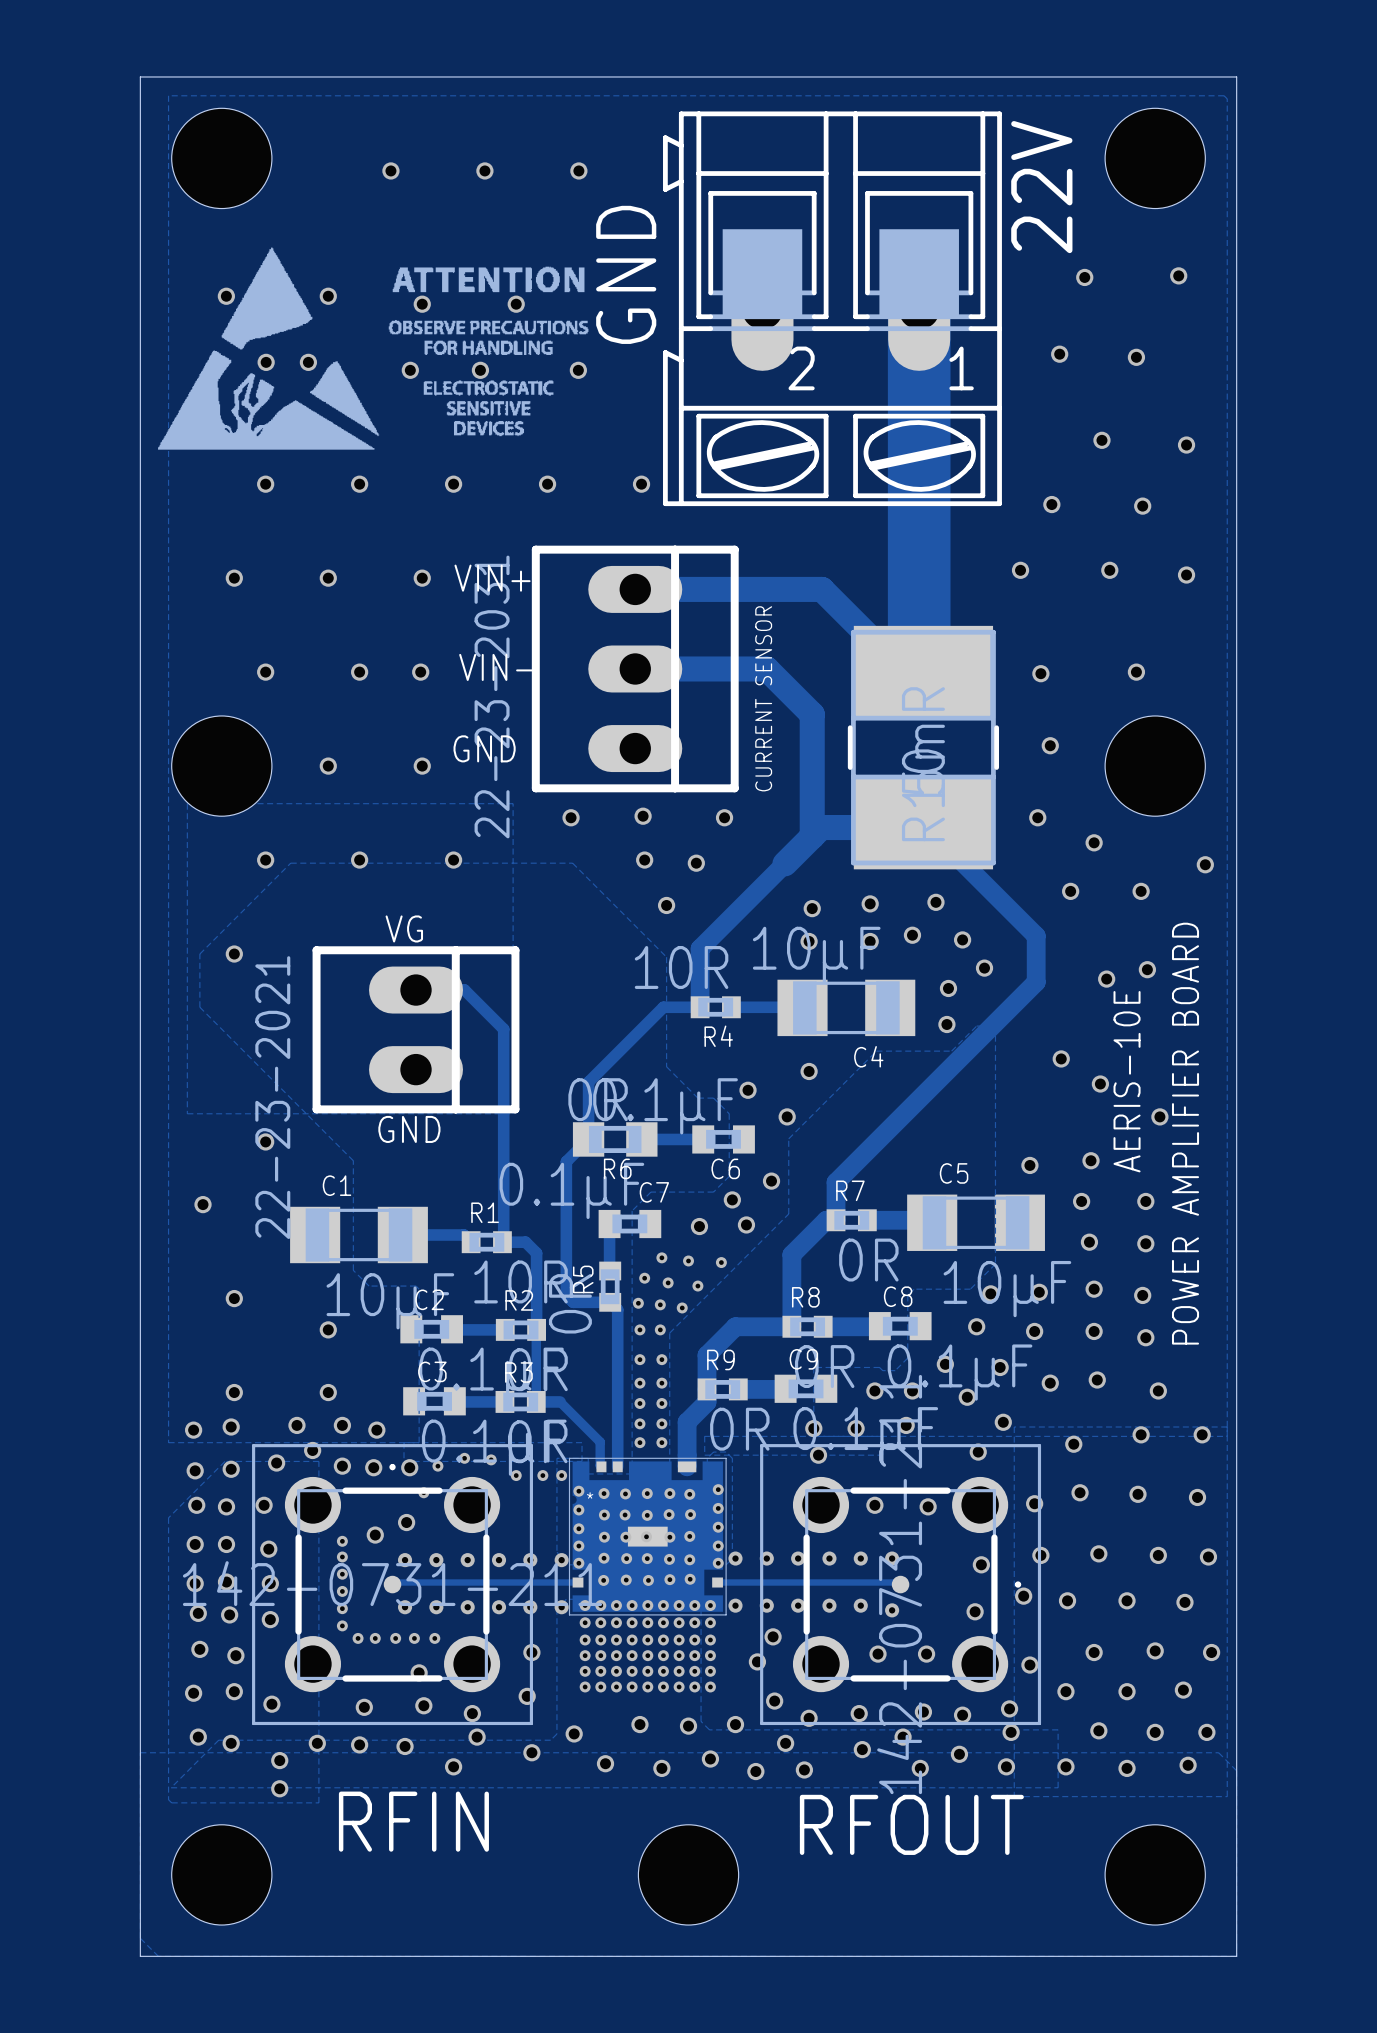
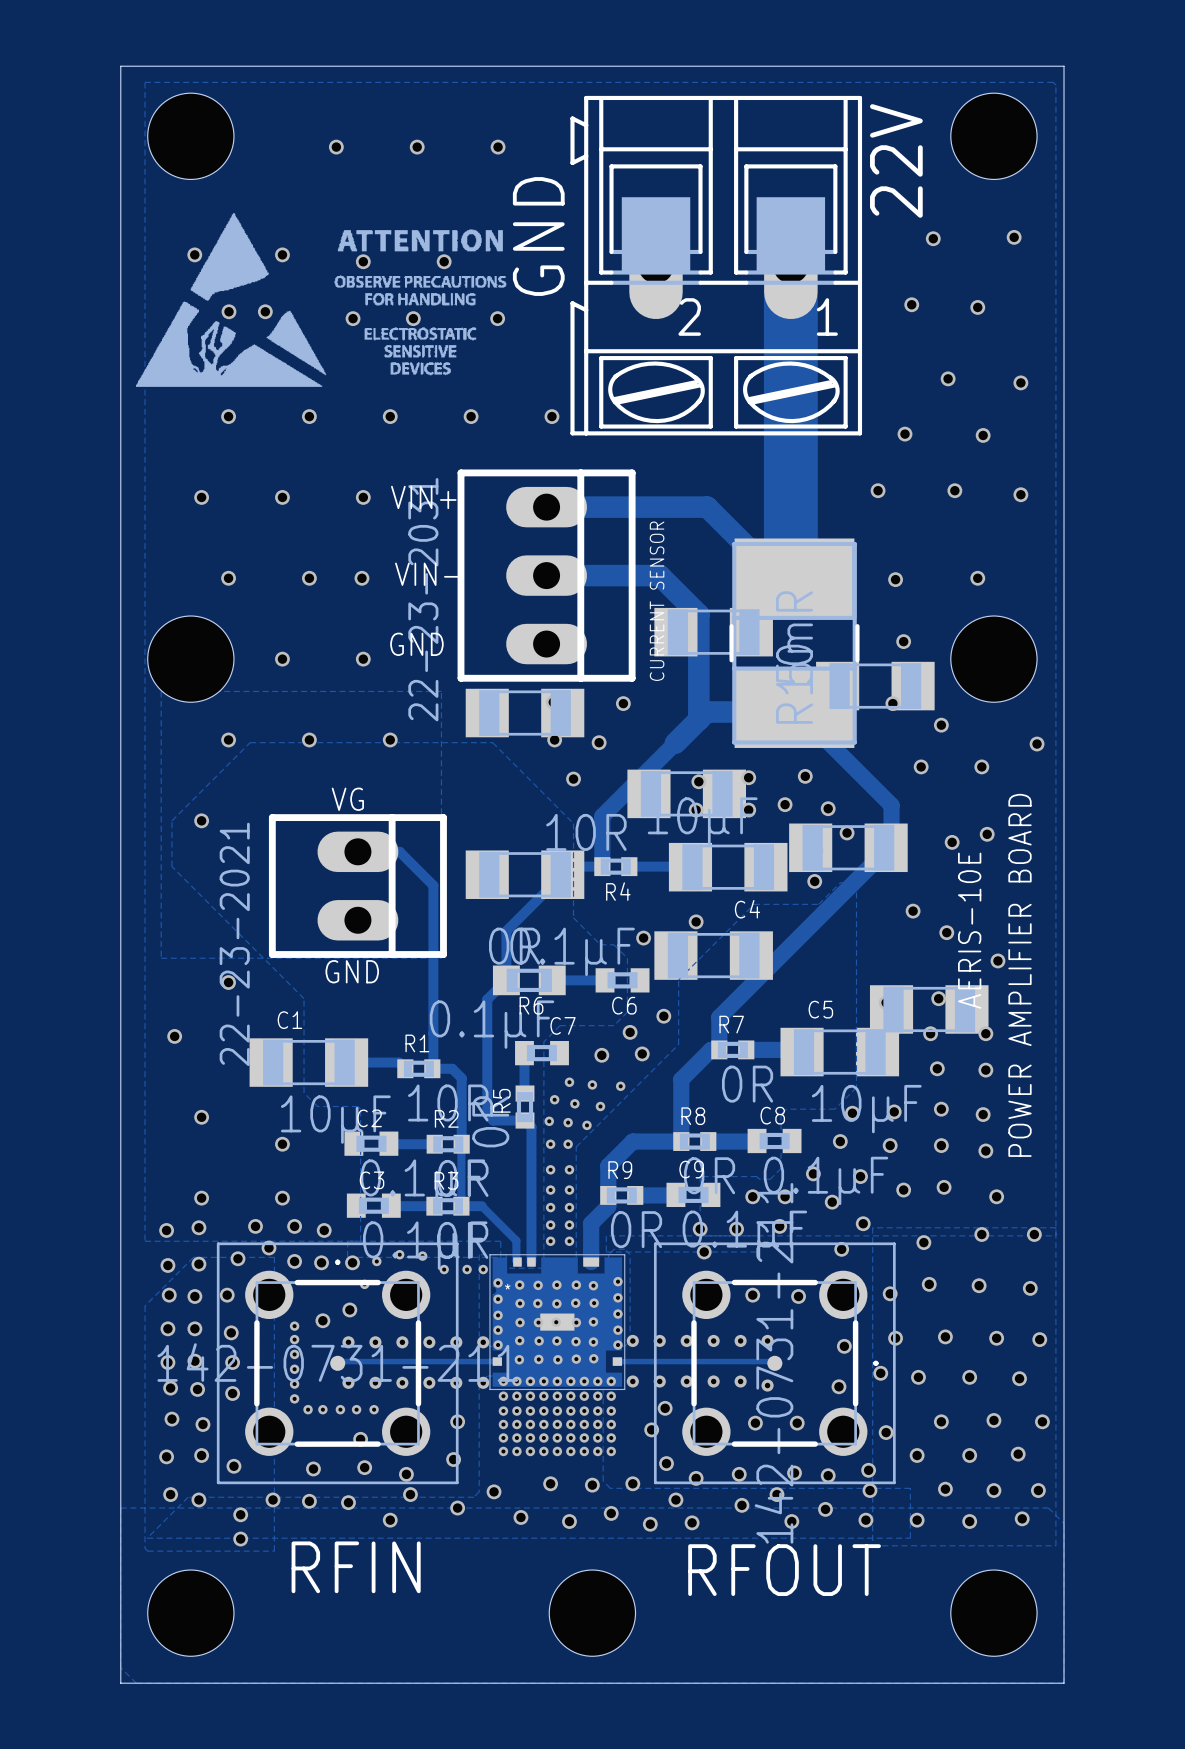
part: none -> (713, 632)
part: none -> (875, 686)
part: none -> (525, 713)
part: none -> (686, 793)
part: none -> (848, 847)
part: none -> (525, 874)
part: none -> (713, 955)
part: none -> (929, 1009)

